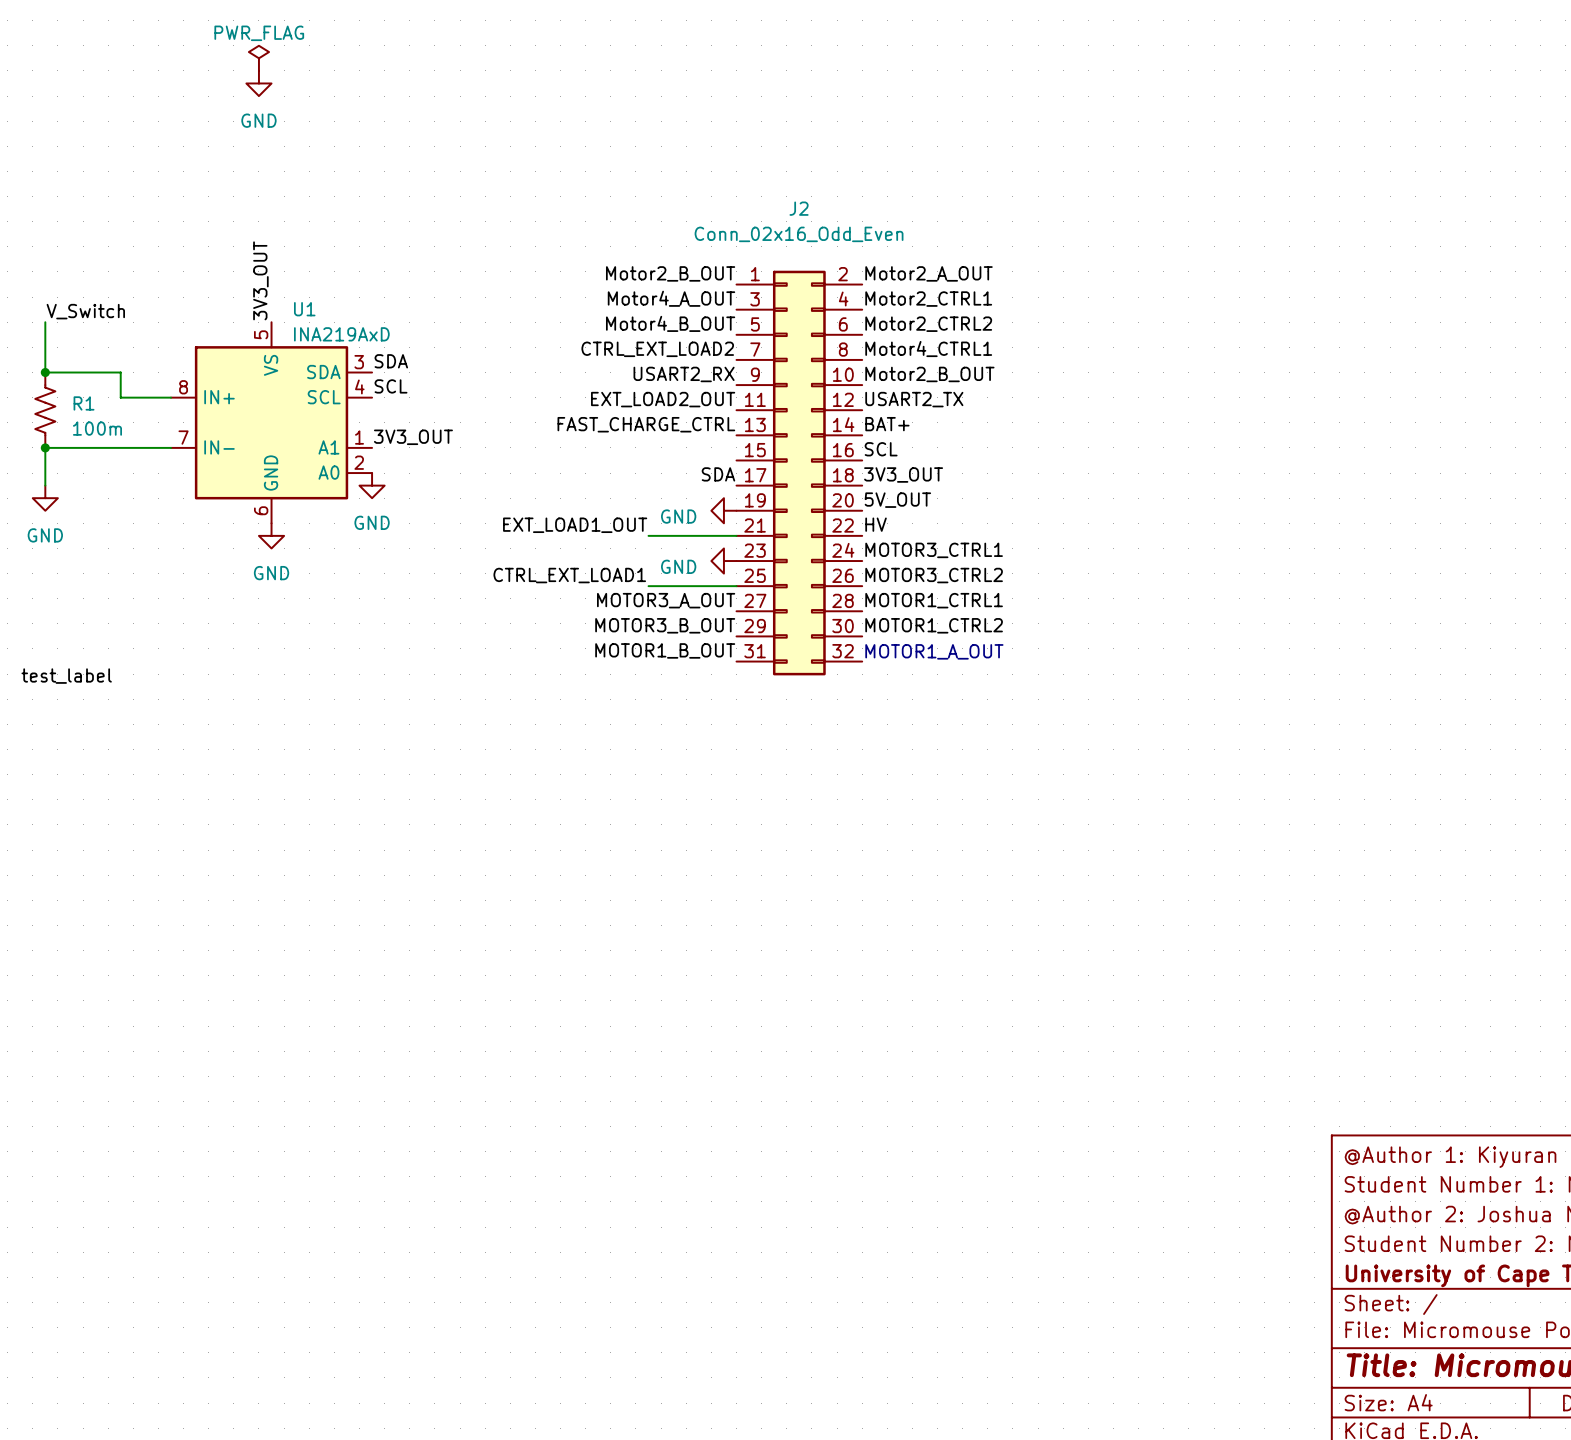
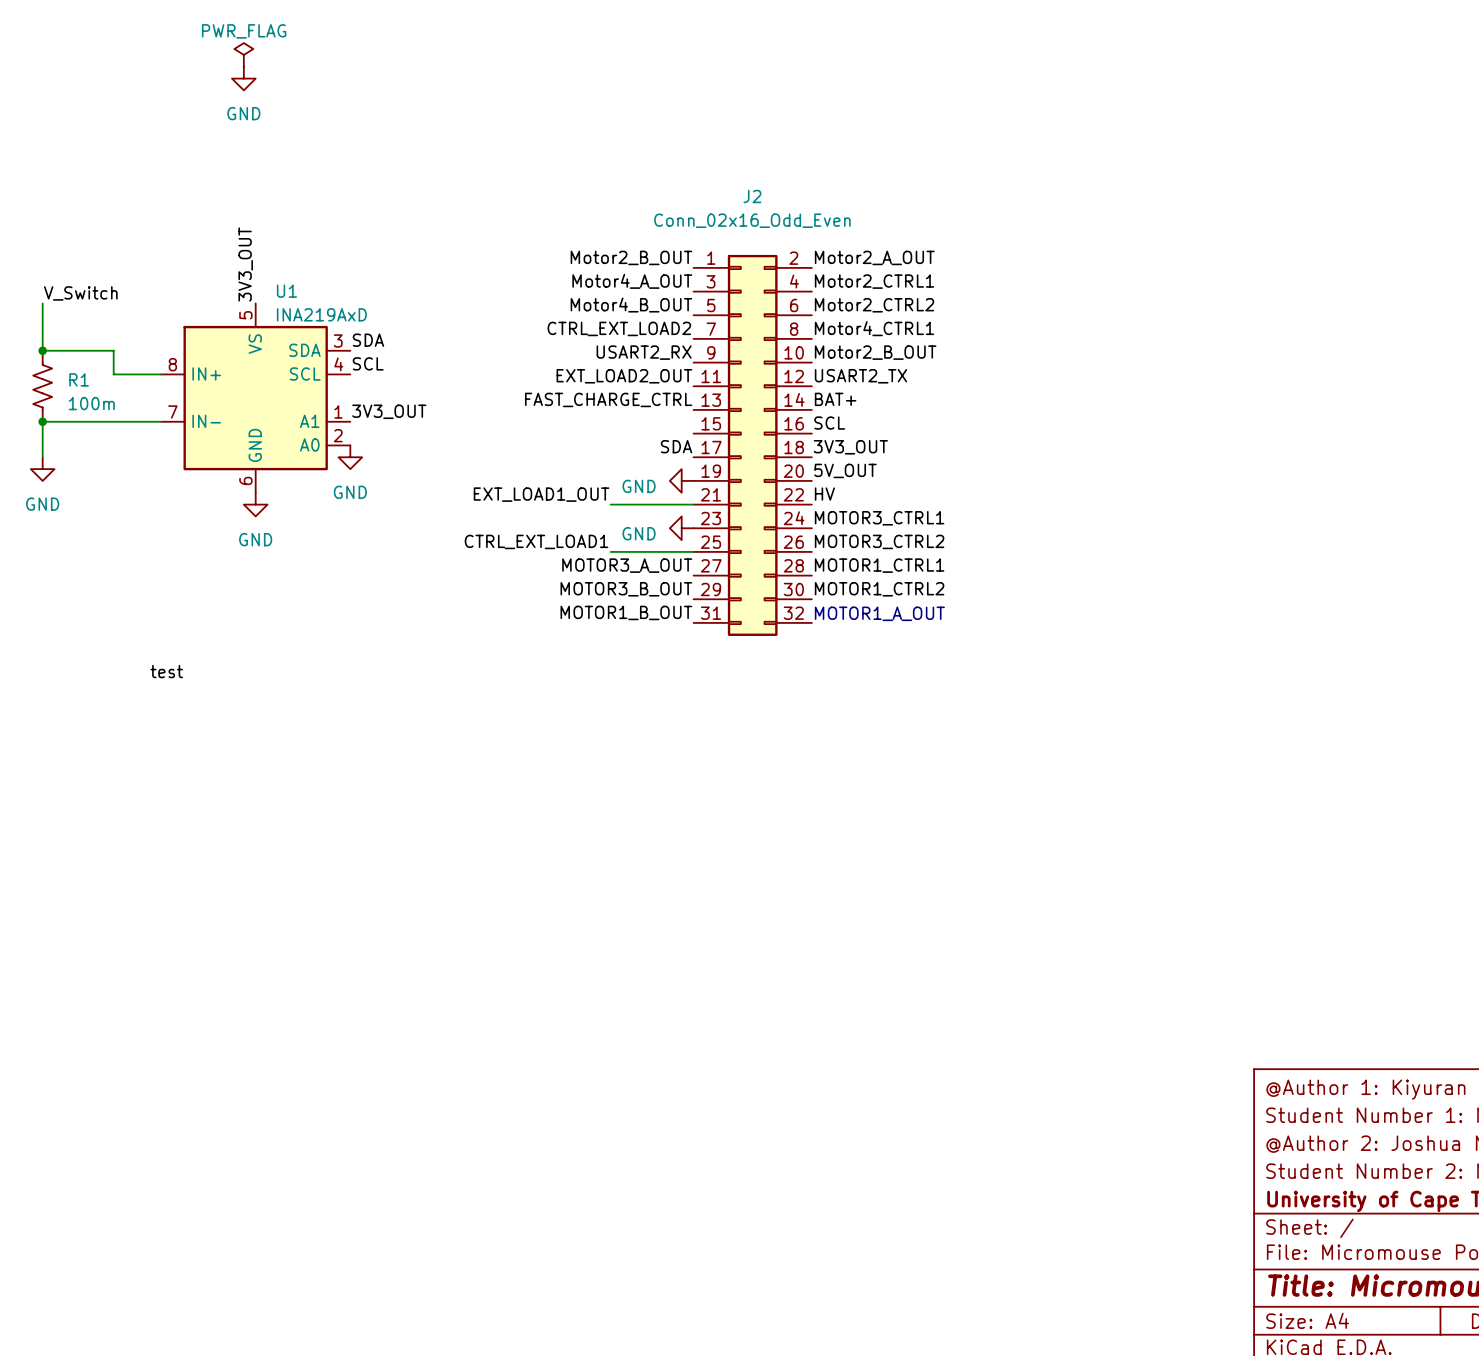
label: test_label (66, 676) -> none
label: none -> test (166, 671)

